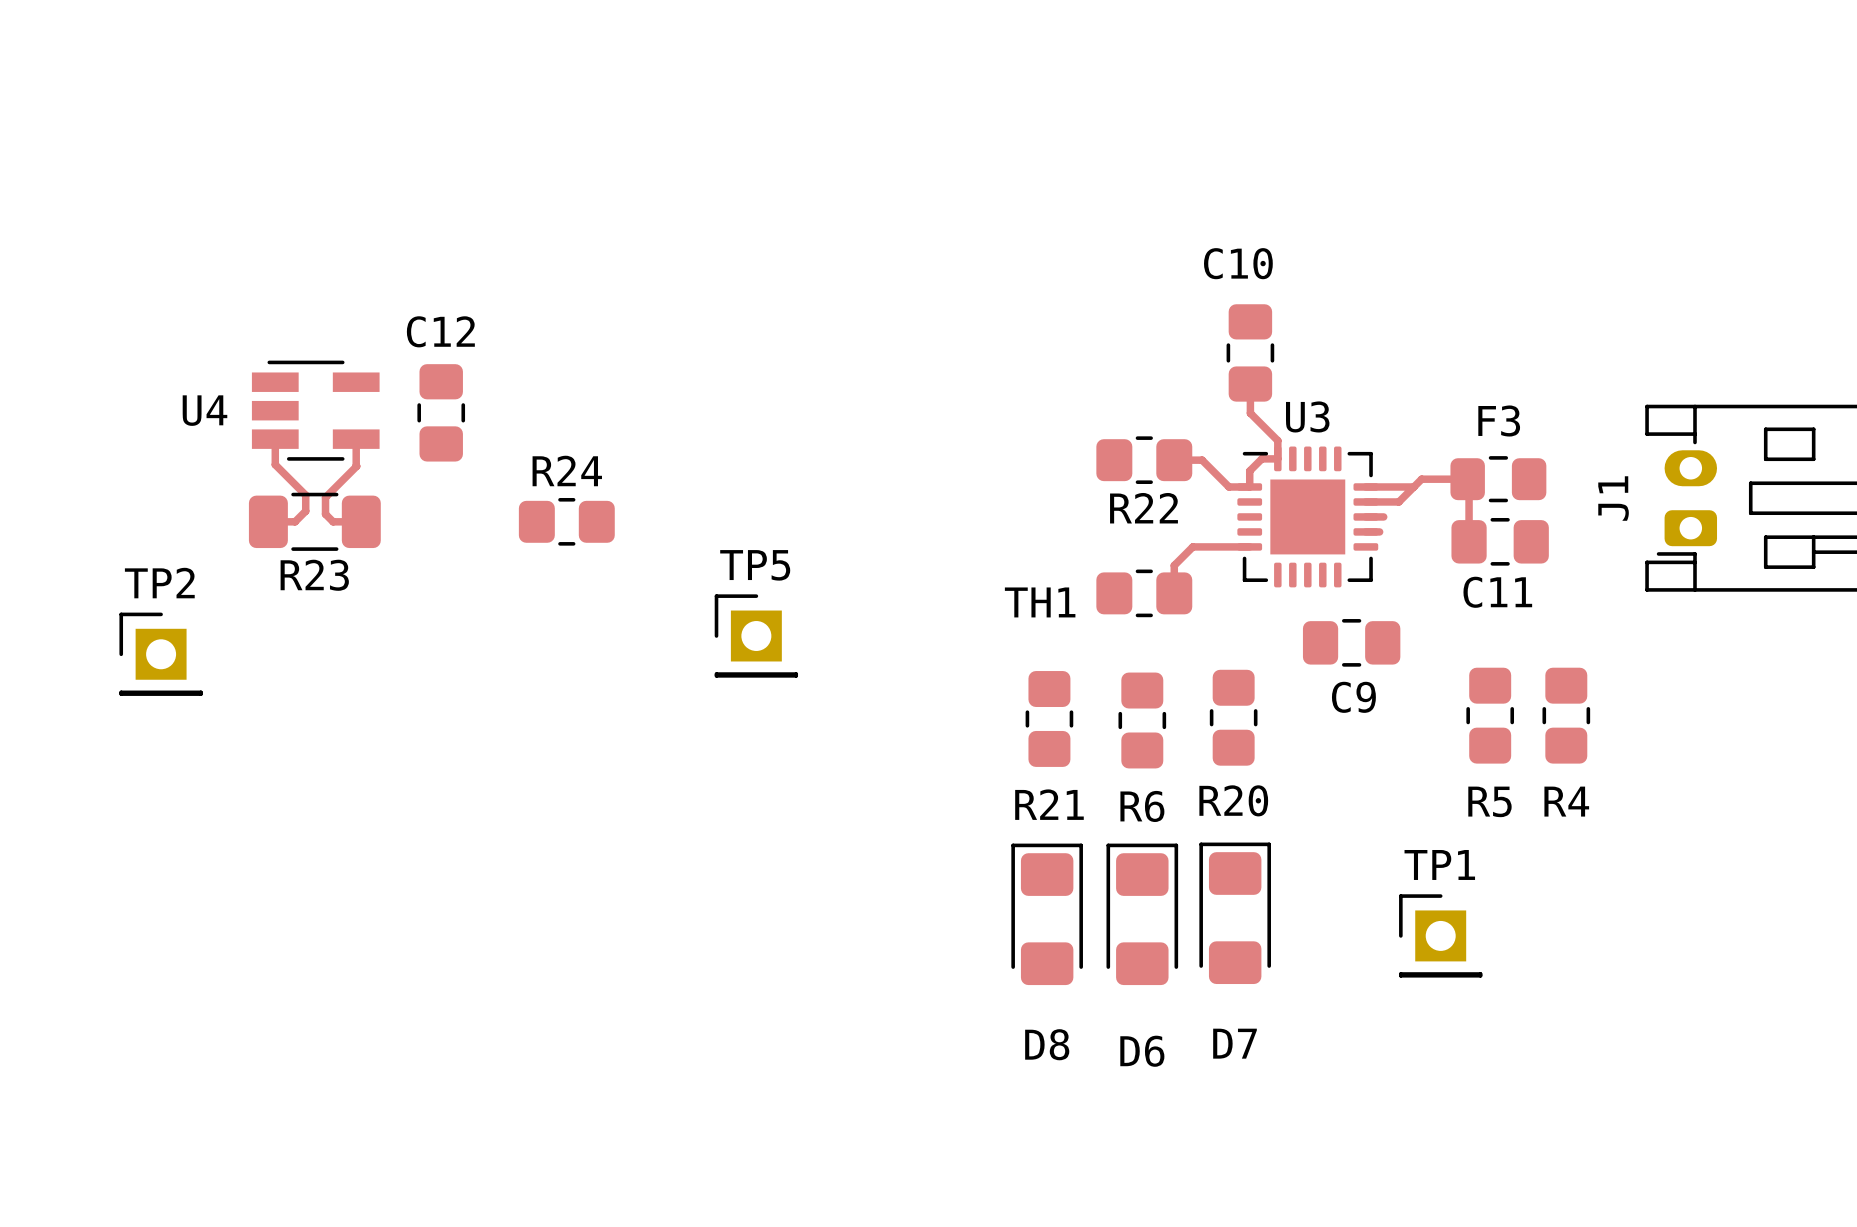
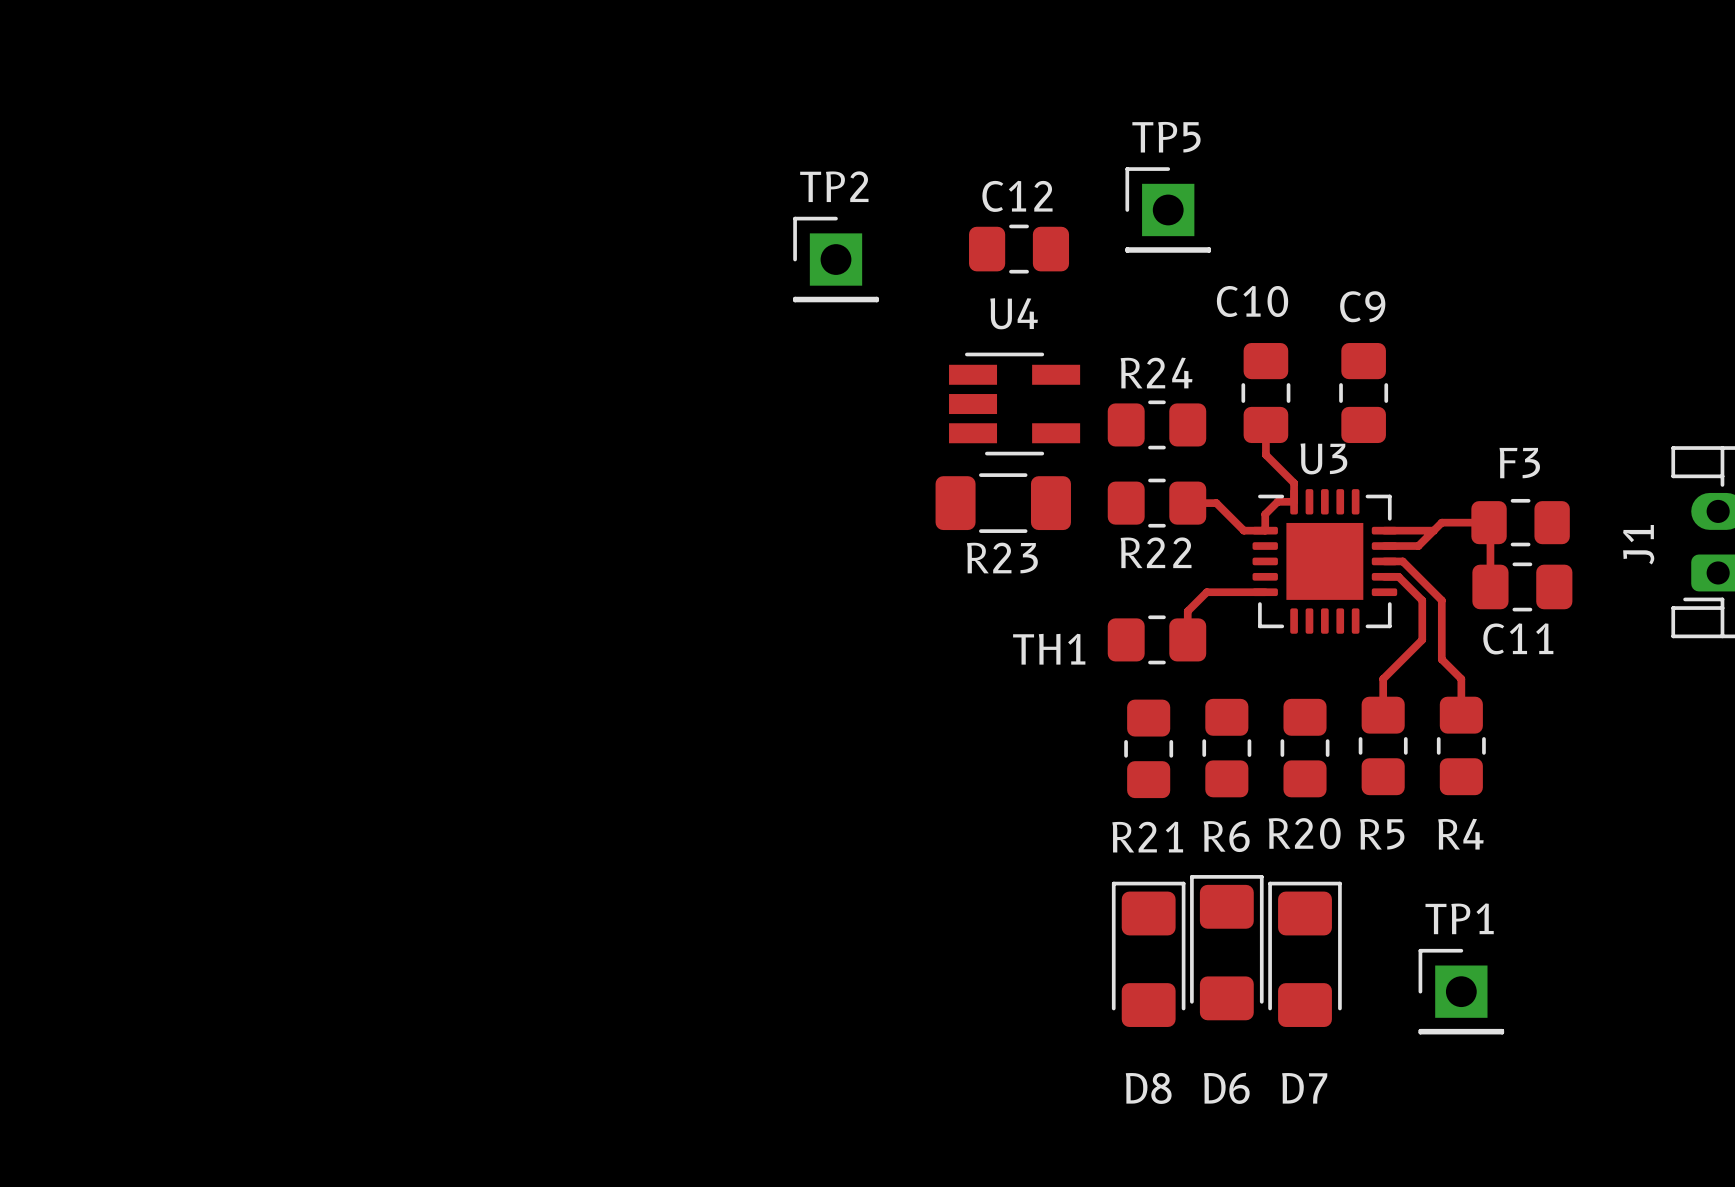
U4 name position: U4 (204, 410) -> U4 (1014, 313)
U4 position: (315, 410) -> (1014, 404)
C12 rotation: 0° (441, 412) -> 90° clockwise (1019, 249)
C12 position: (441, 412) -> (1019, 249)
track: (275, 439) (275, 464) (305, 495) (305, 511) (295, 521) (268, 521) -> none
track: (356, 439) (356, 466) (325, 497) (325, 514) (333, 521) (361, 521) -> none
track: none -> (1402, 561) (1441, 600) (1441, 659) (1461, 678) (1461, 715)
R23 position: (314, 521) -> (1003, 503)
R24 position: (566, 521) -> (1156, 424)
track: none -> (1398, 576) (1422, 600) (1422, 639) (1383, 678) (1383, 715)
TP5 position: (756, 636) -> (1168, 209)
C9 rotation: 0° (1351, 642) -> 90° clockwise (1363, 393)
C9 position: (1351, 642) -> (1363, 393)
TP2 position: (161, 654) -> (836, 259)
C9 name position: C9 (1353, 697) -> C9 (1362, 306)
R5 position: (1490, 715) -> (1383, 745)
R4 position: (1566, 715) -> (1461, 745)
R20 position: (1233, 717) -> (1305, 748)
R21 position: (1049, 718) -> (1148, 748)
R6 position: (1142, 720) -> (1226, 748)
D7 position: (1235, 913) -> (1305, 954)
D8 position: (1047, 914) -> (1148, 954)
D6 position: (1142, 914) -> (1226, 947)

